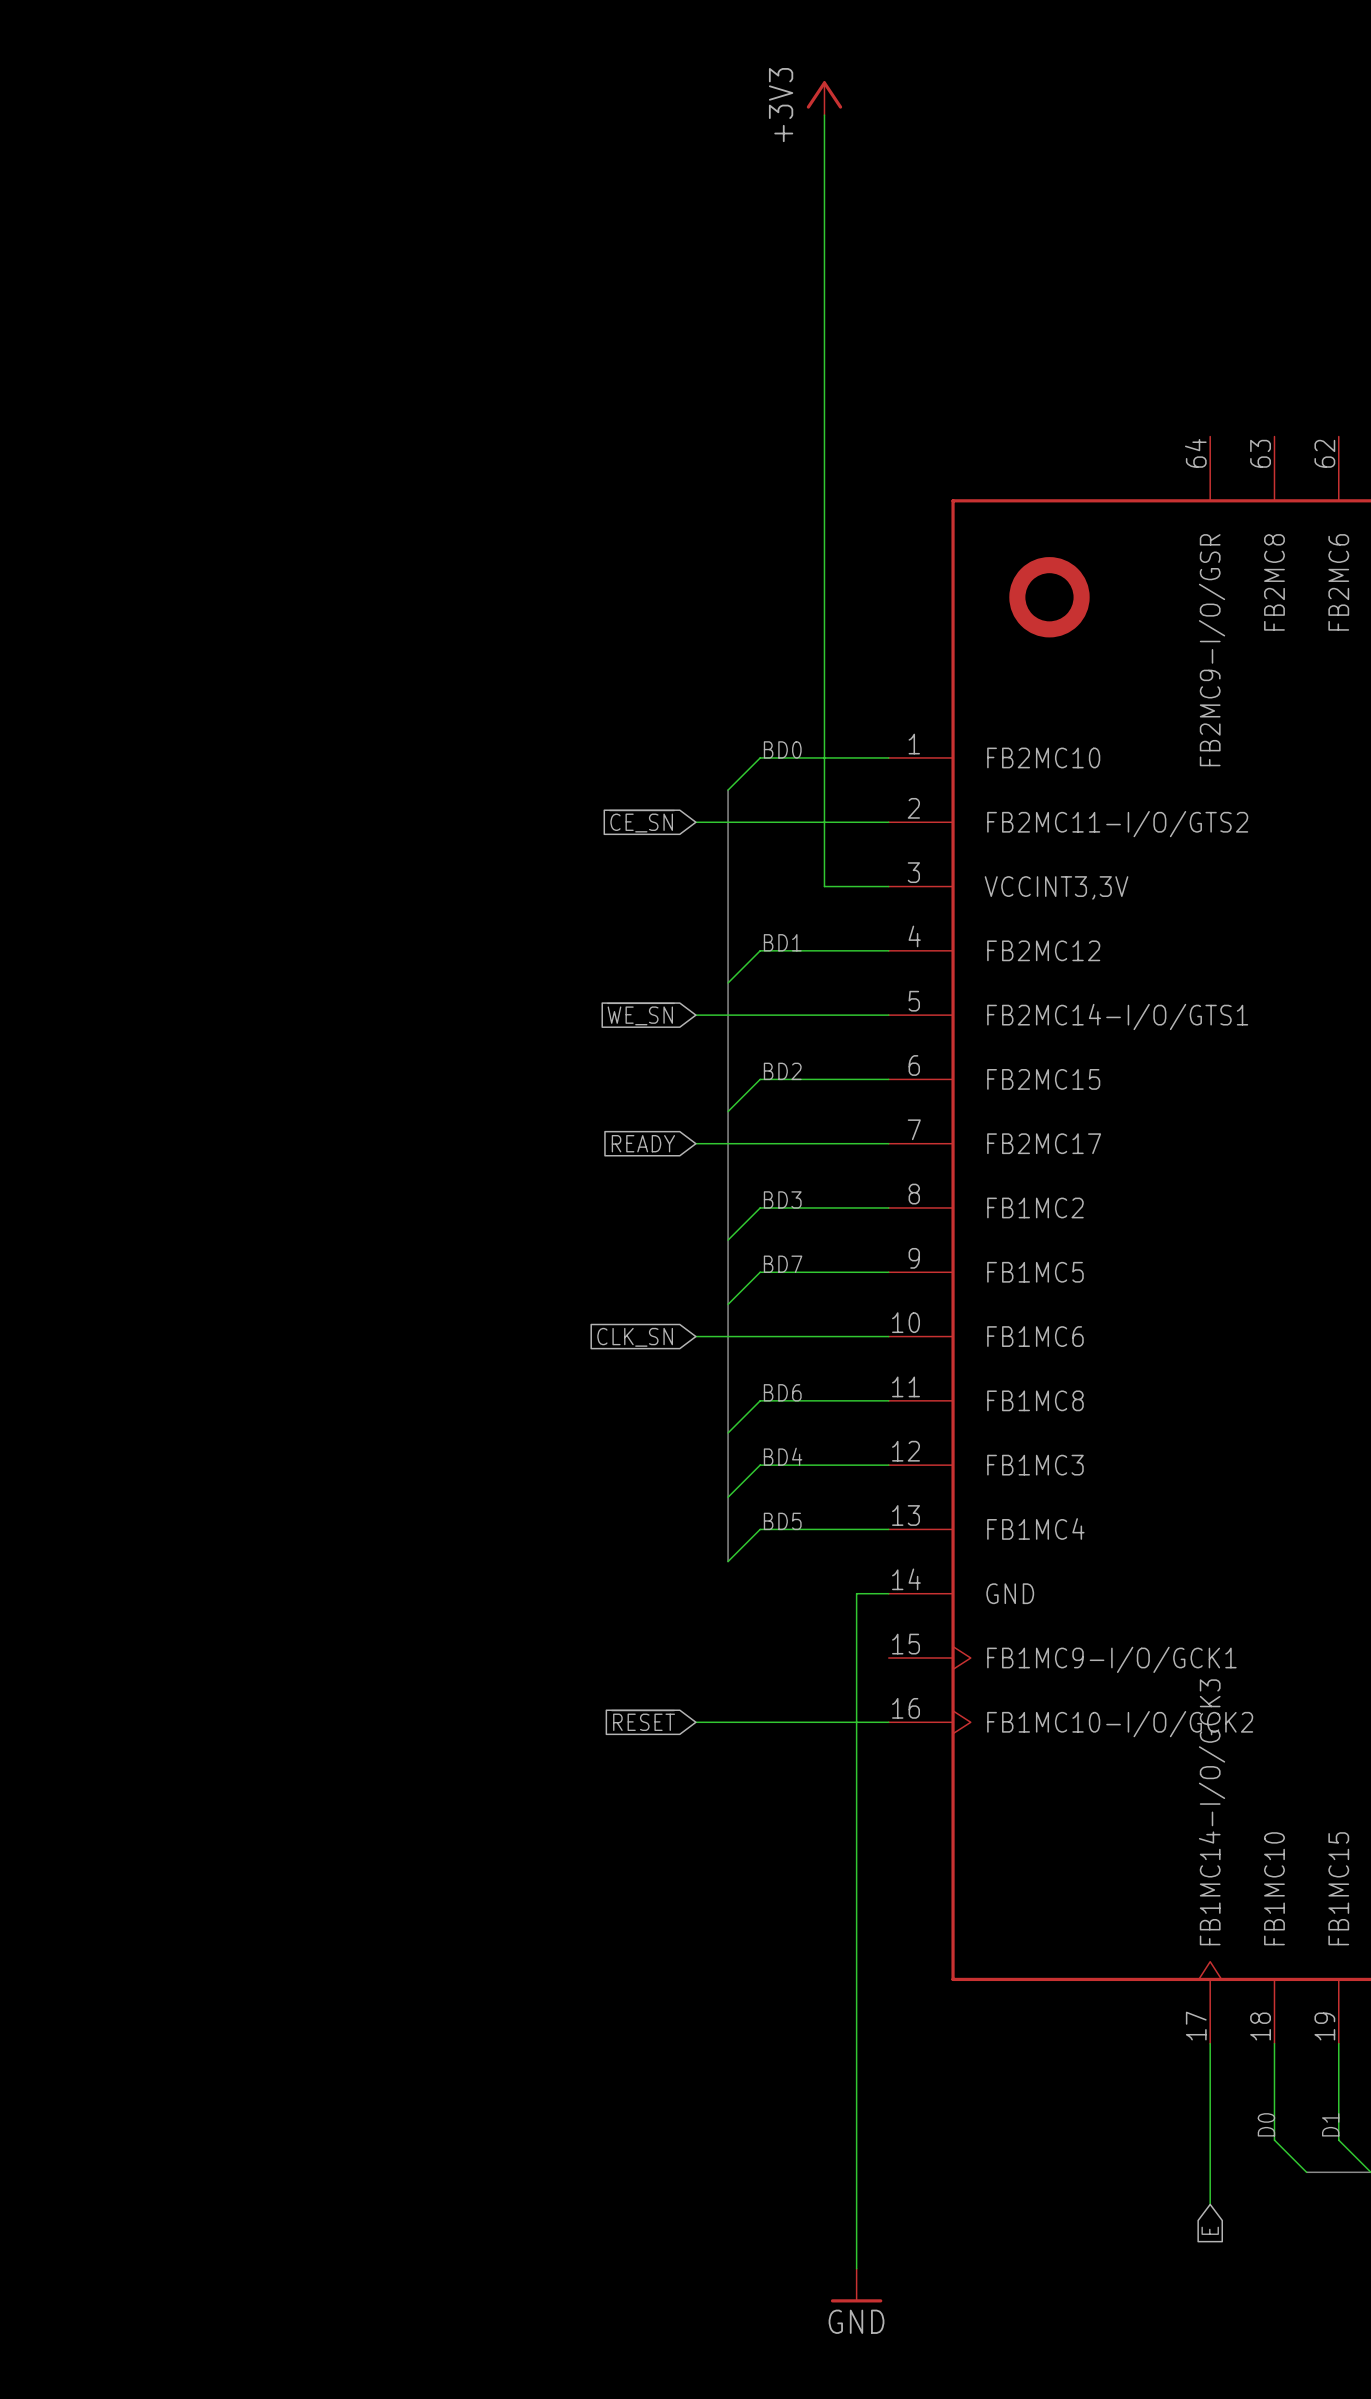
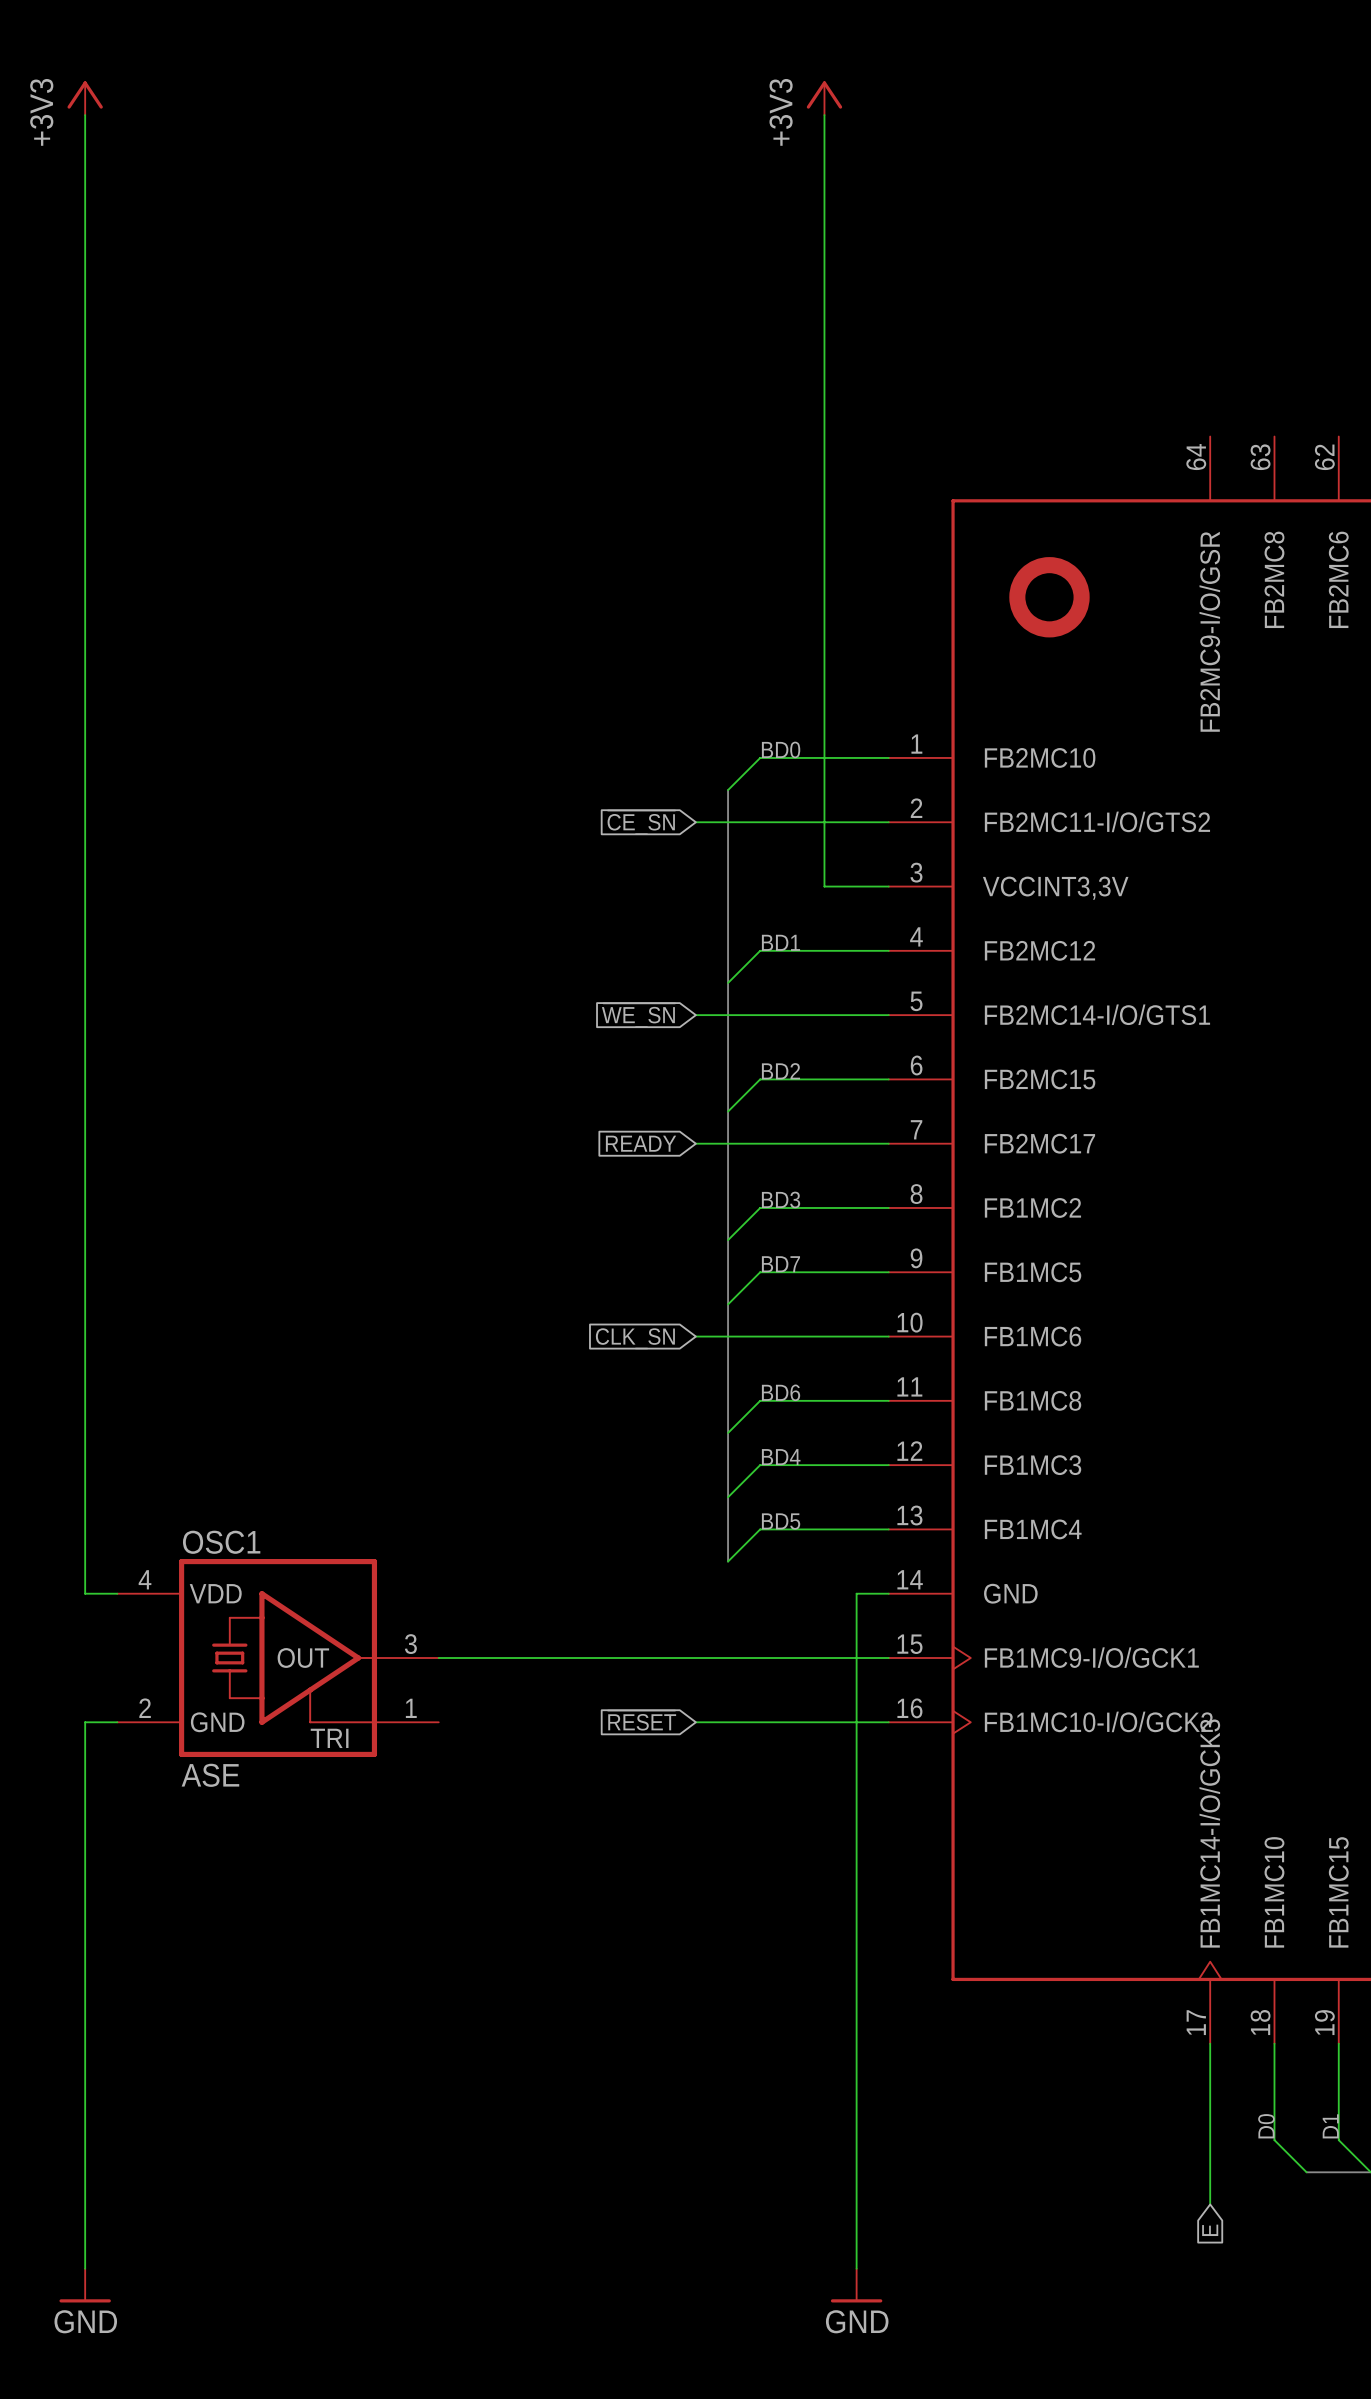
power symbol: none -> +3V3 (85, 98)
wire: none -> (85, 115) (85, 1593) (117, 1593)
OSC1: none -> ASE (278, 1658)
wire: none -> (438, 1658) (888, 1658)
wire: none -> (117, 1722) (85, 1722) (85, 2268)
power symbol: none -> GND (85, 2285)

